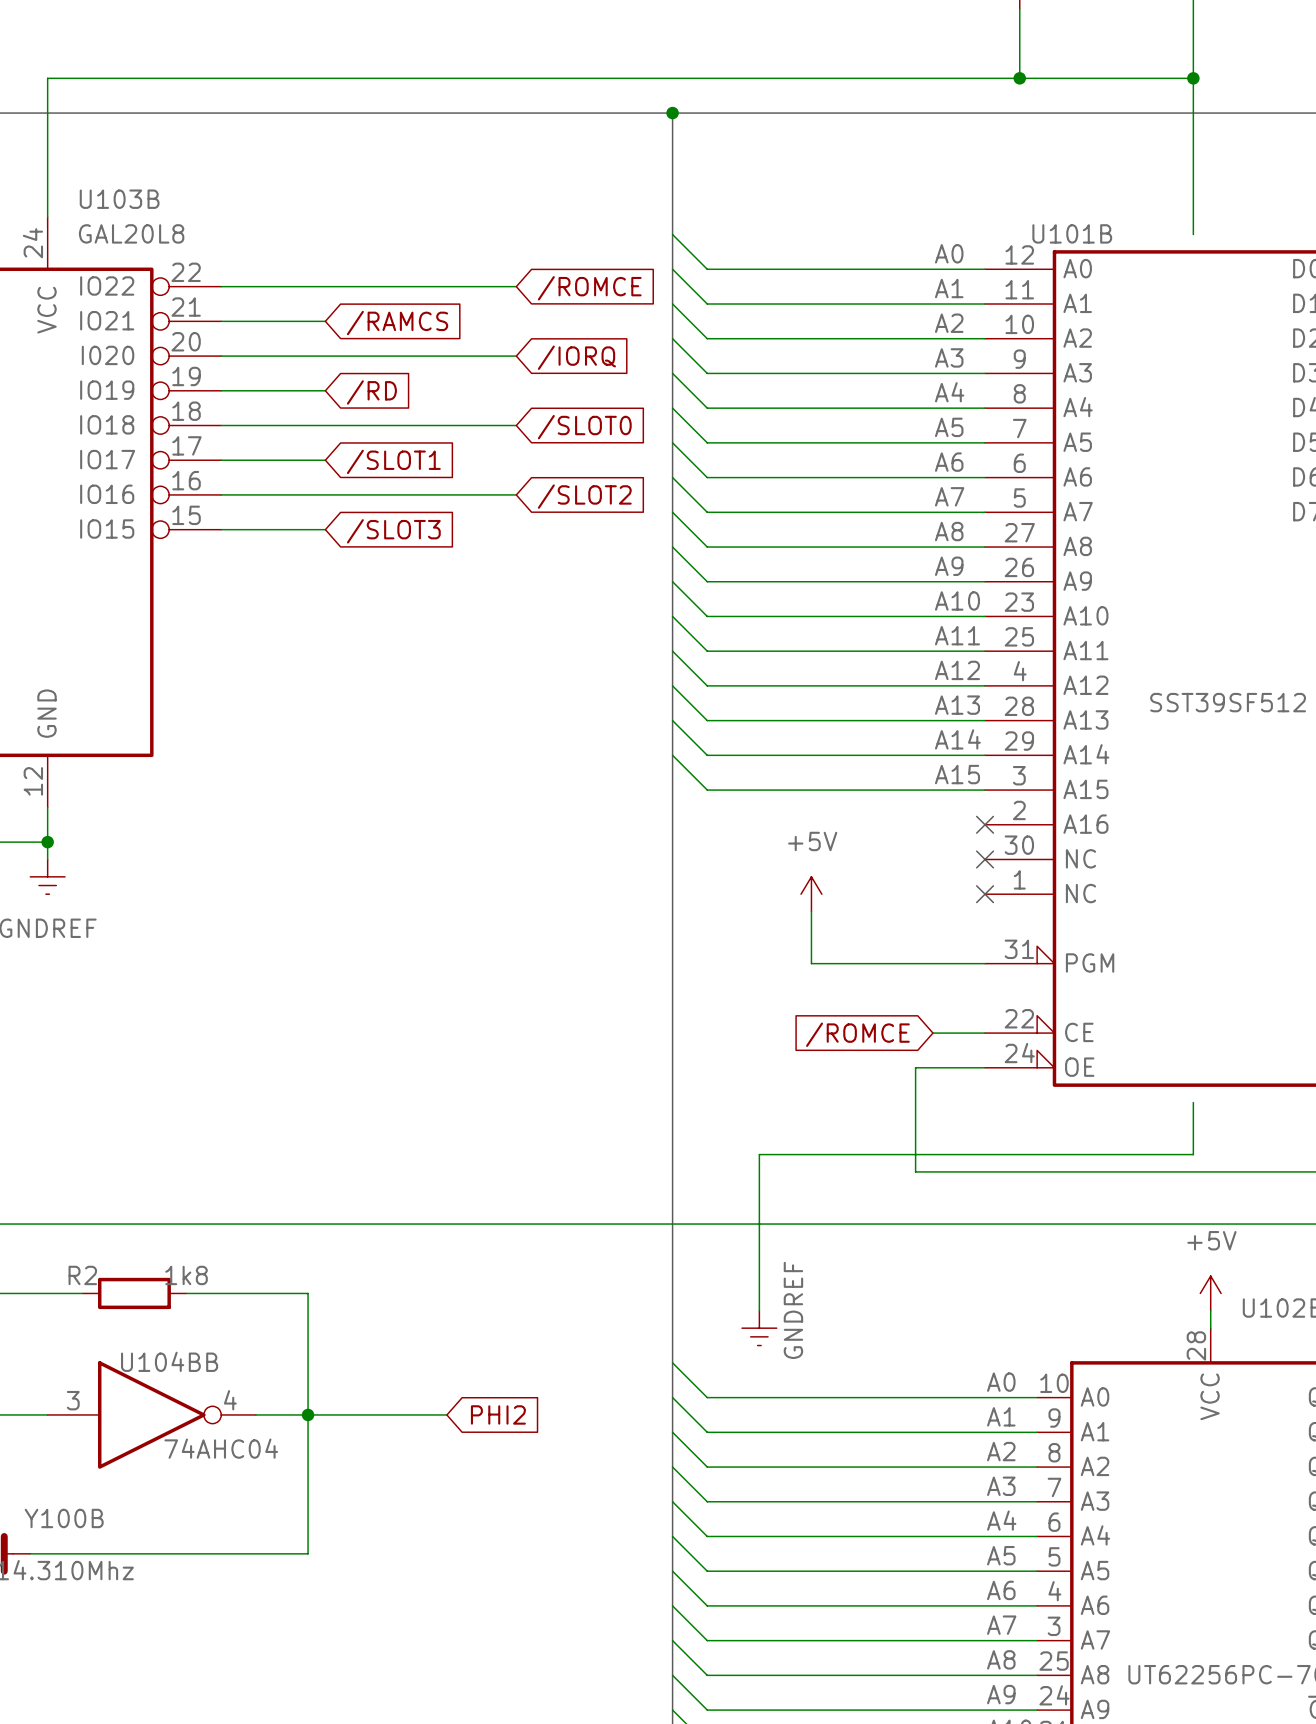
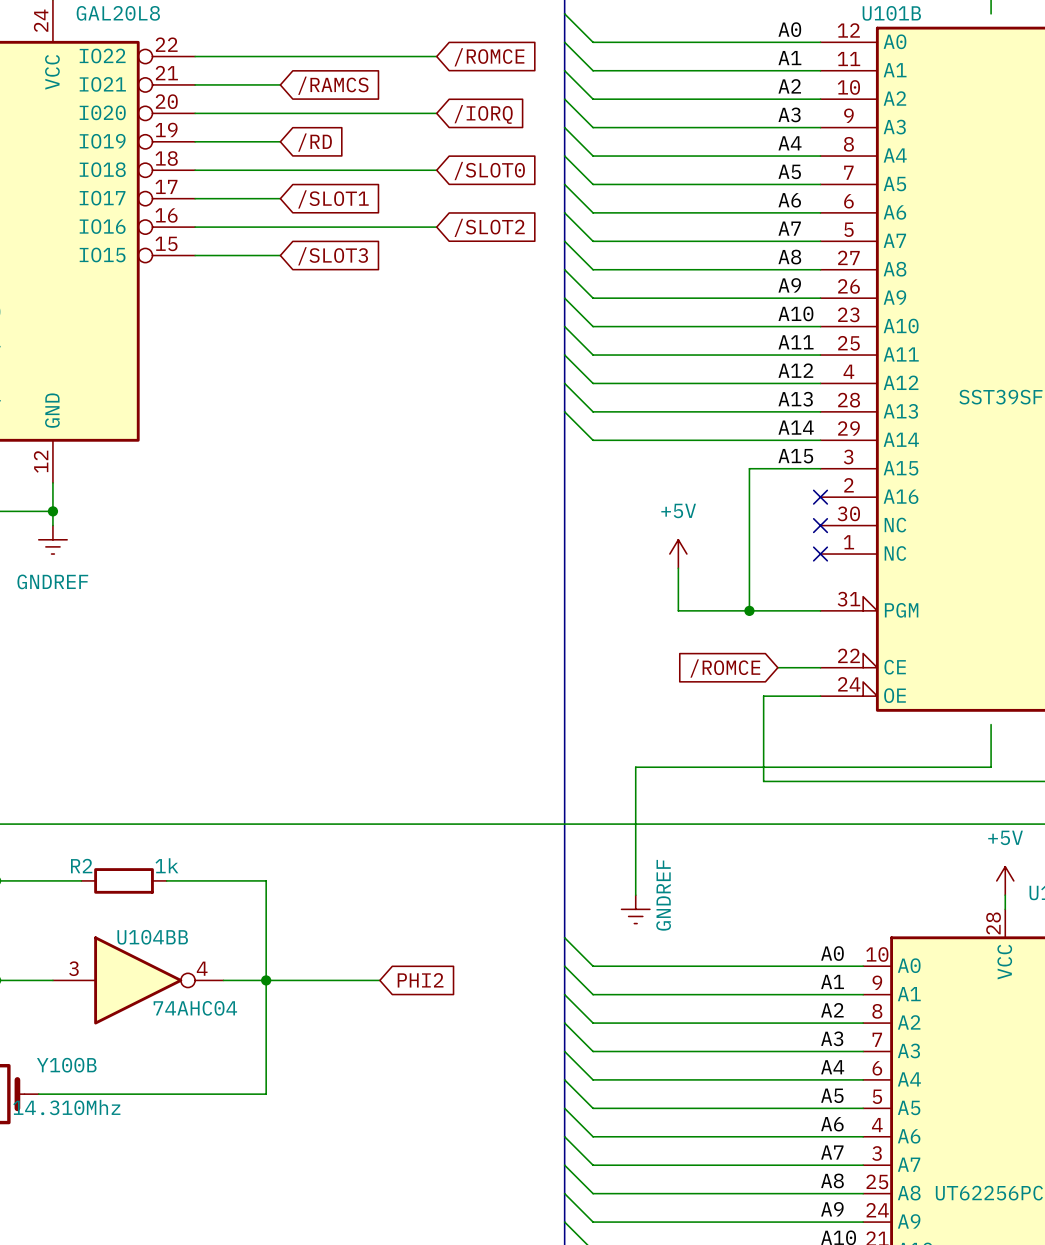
wire: (672, 755) (707, 790) (898, 790) -> (749, 610) (749, 468)
junction: none -> (749, 610)
R2 value: 1k8 (186, 1275) -> 1k (166, 865)

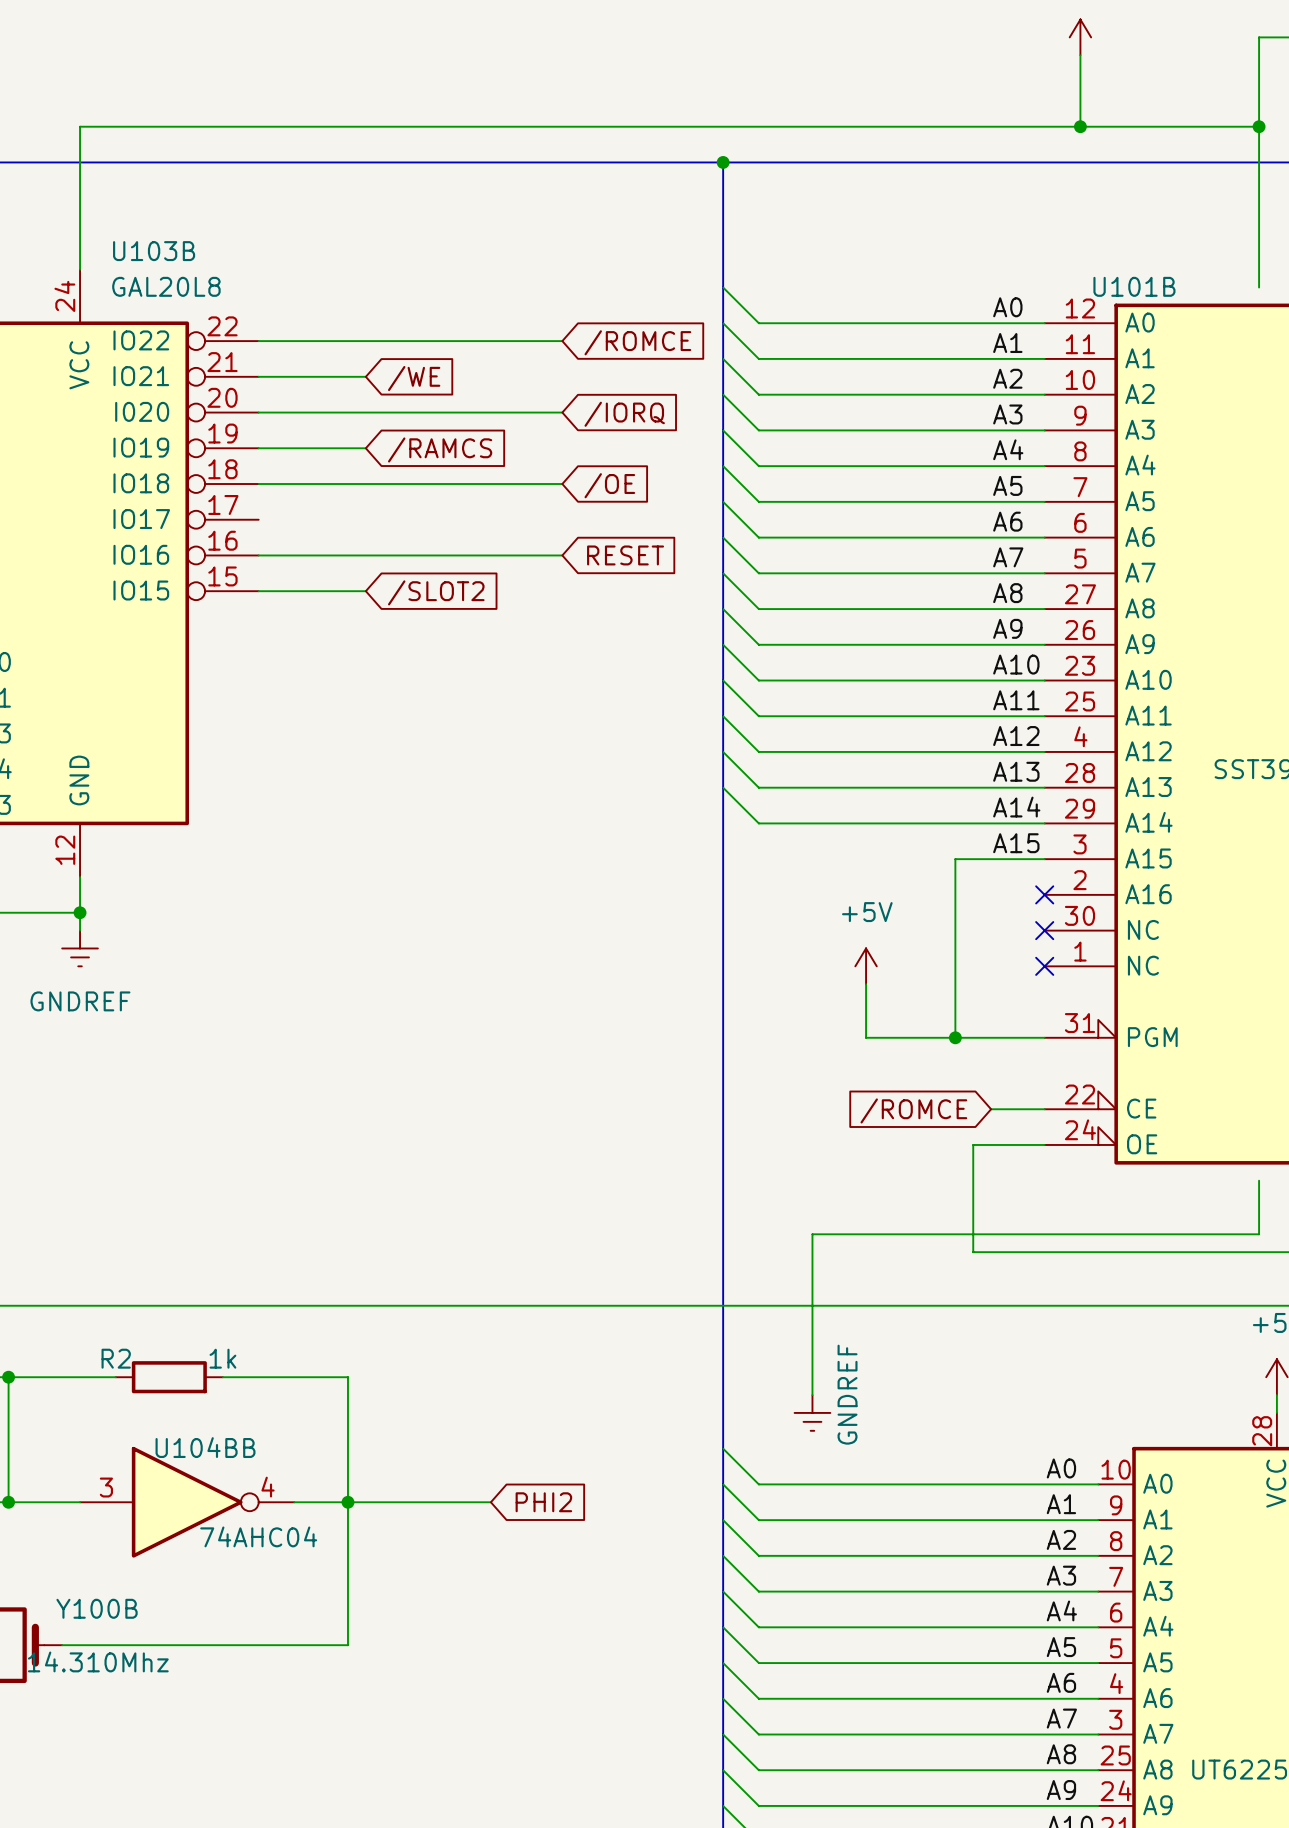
global label: /RAMCS (333, 85) -> /WE (414, 378)
global label: /RD (315, 142) -> /RAMCS (440, 449)
global label: /SLOT0 (489, 171) -> /OE (609, 485)
wire: (195, 198) (280, 198) -> none
global label: /SLOT1 (333, 199) -> none
global label: /SLOT2 (489, 227) -> RESET (625, 555)
global label: /SLOT3 (333, 256) -> /SLOT2 (436, 592)

